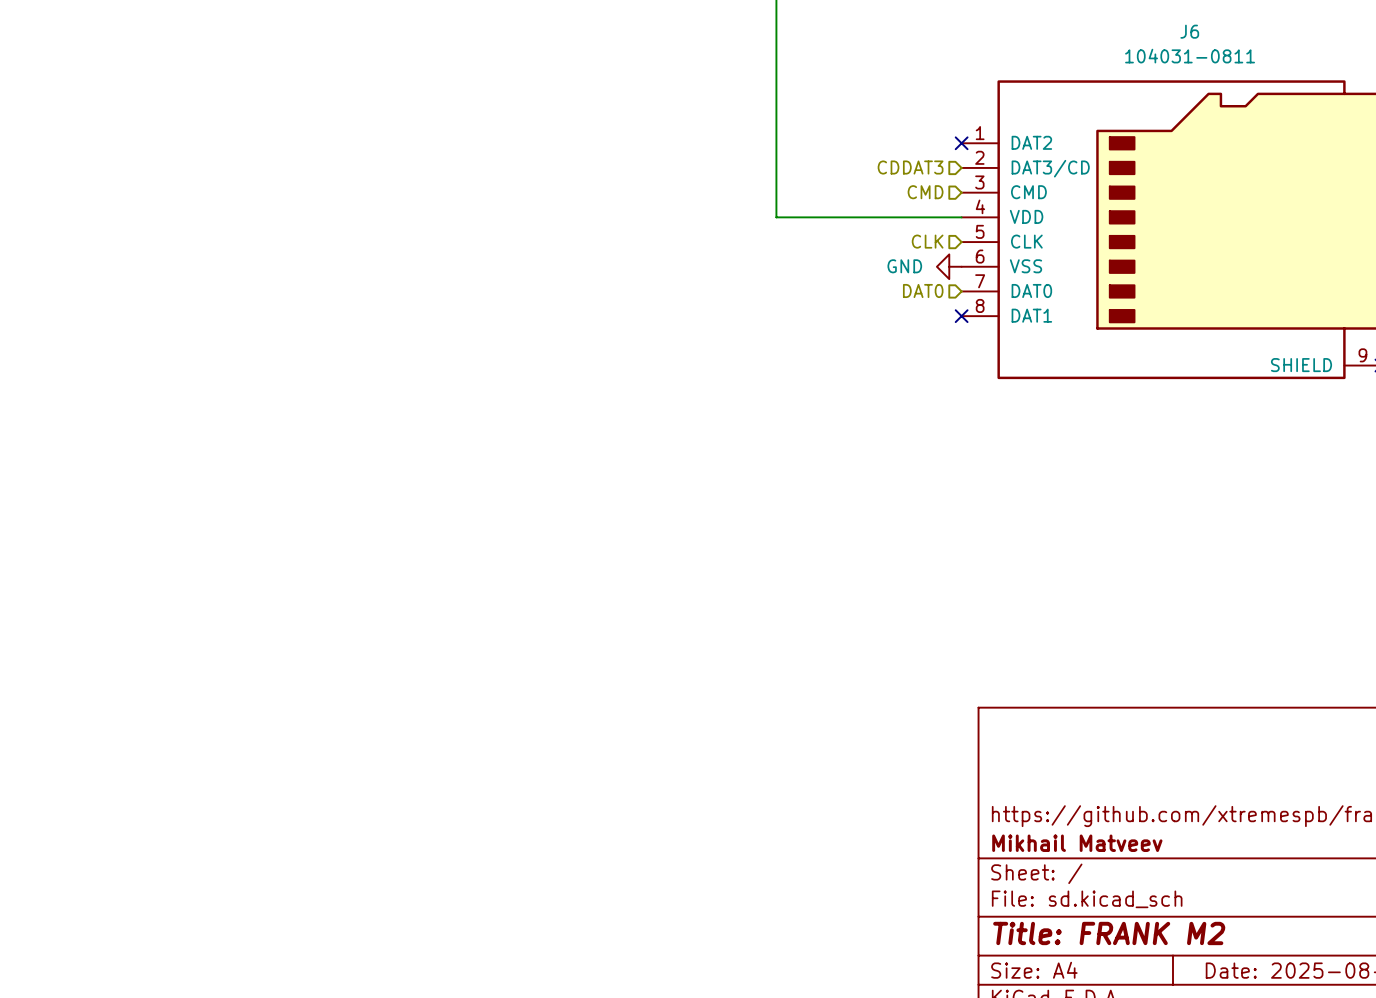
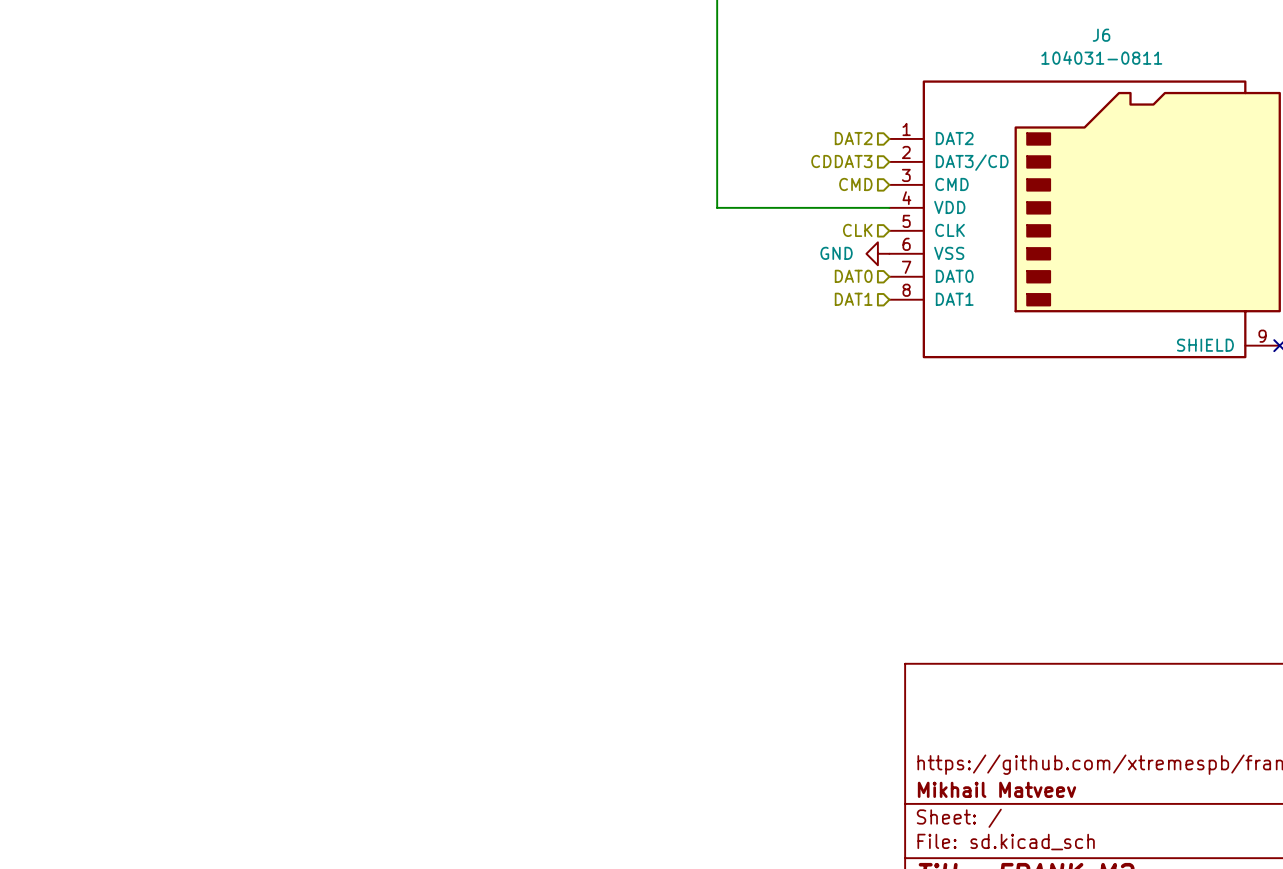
hierarchical label: none -> DAT2 (853, 138)
no-connect mark: (961, 143) -> none
hierarchical label: none -> DAT1 (853, 299)
no-connect mark: (961, 316) -> none

